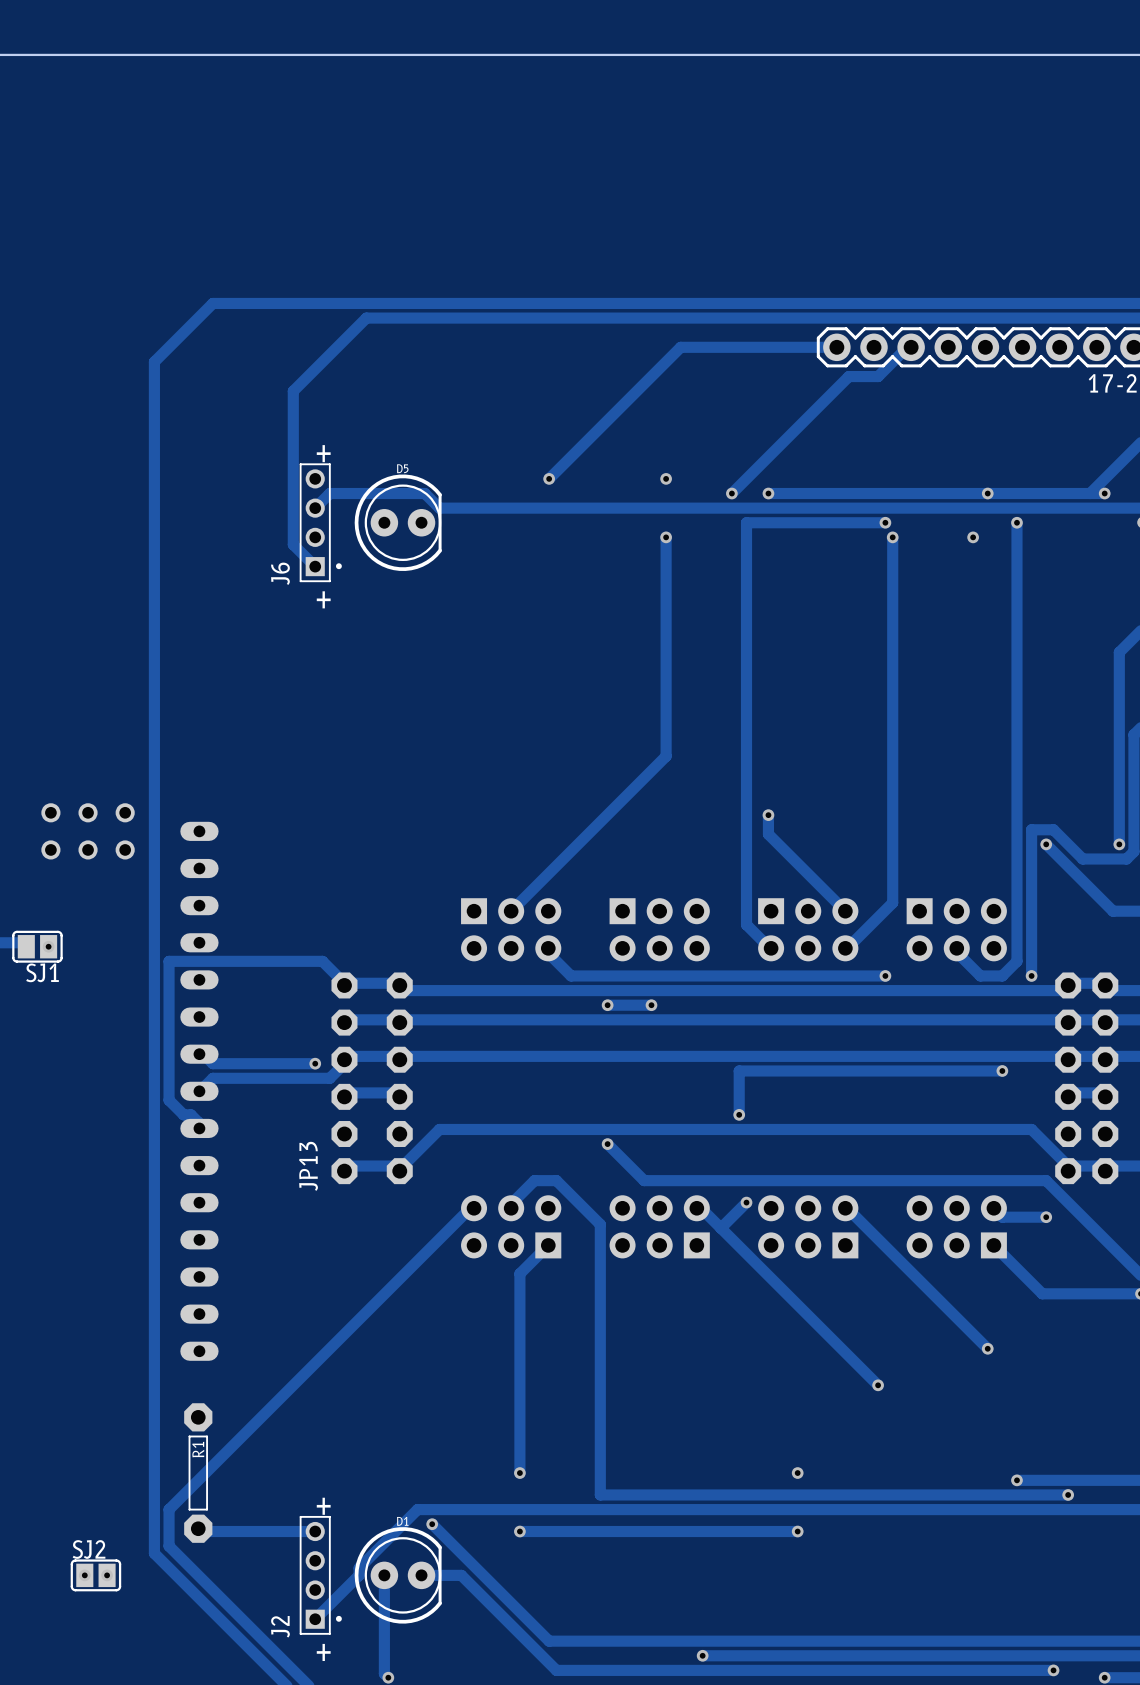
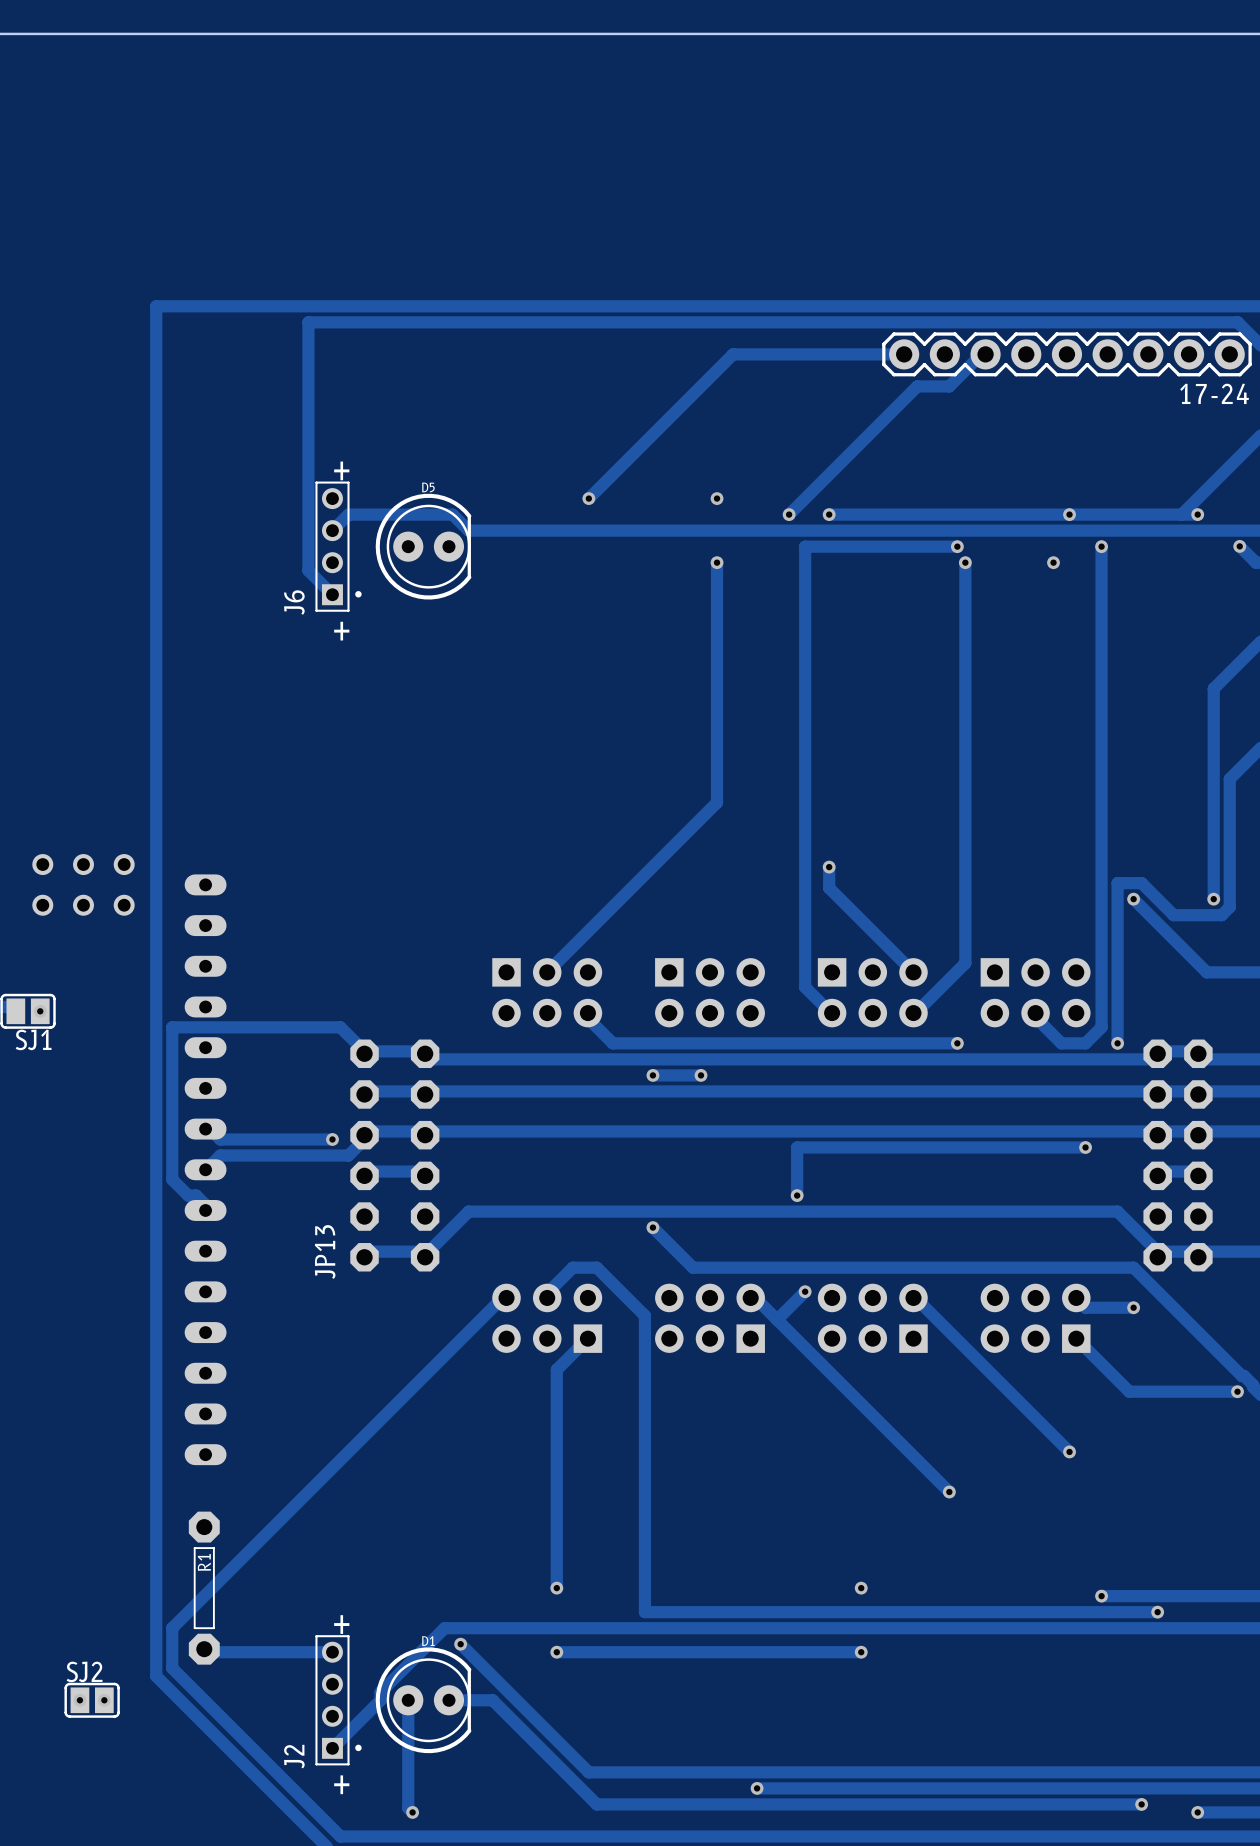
track: (212, 303) (154, 361) -> (220, 306) (156, 306) (156, 370)
track: (366, 318) (293, 391) -> (388, 322) (308, 322) (308, 402)

